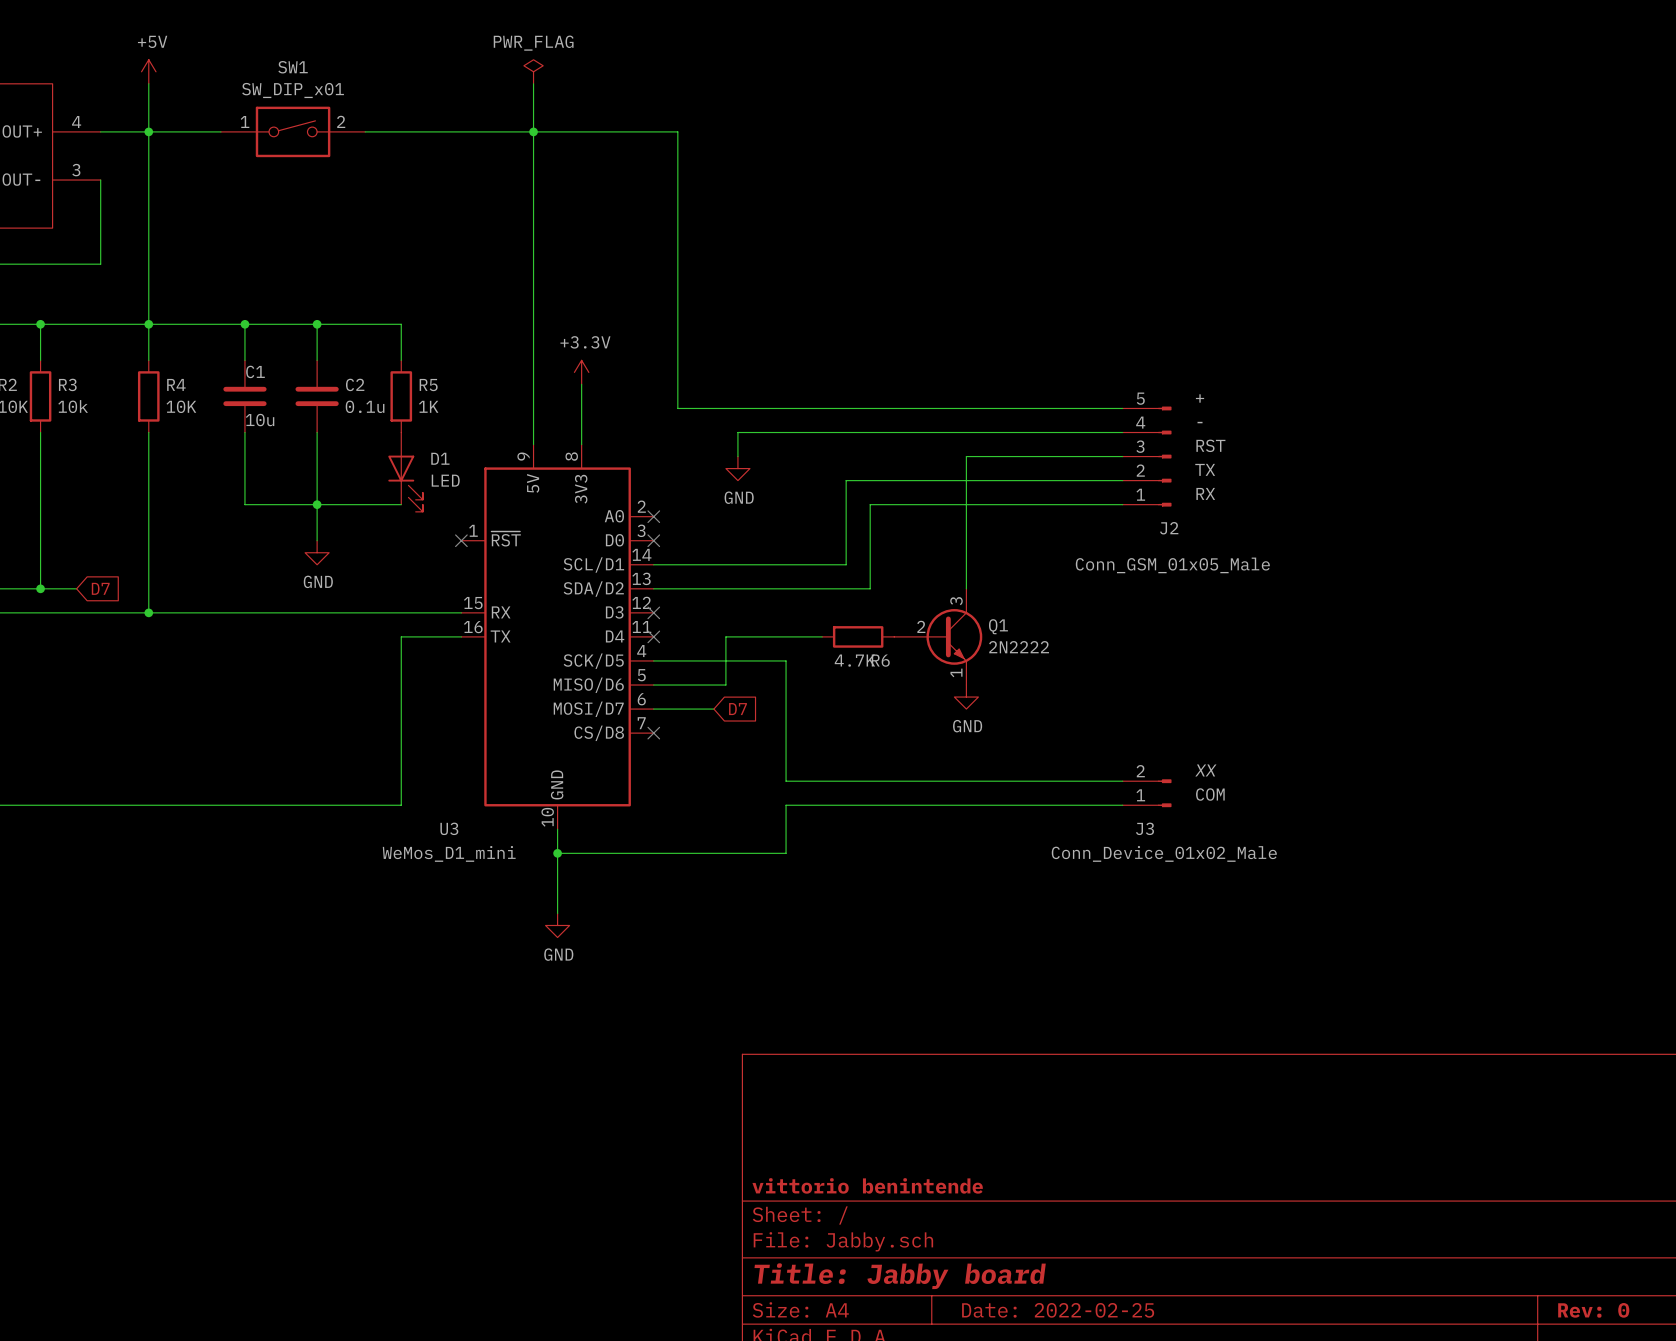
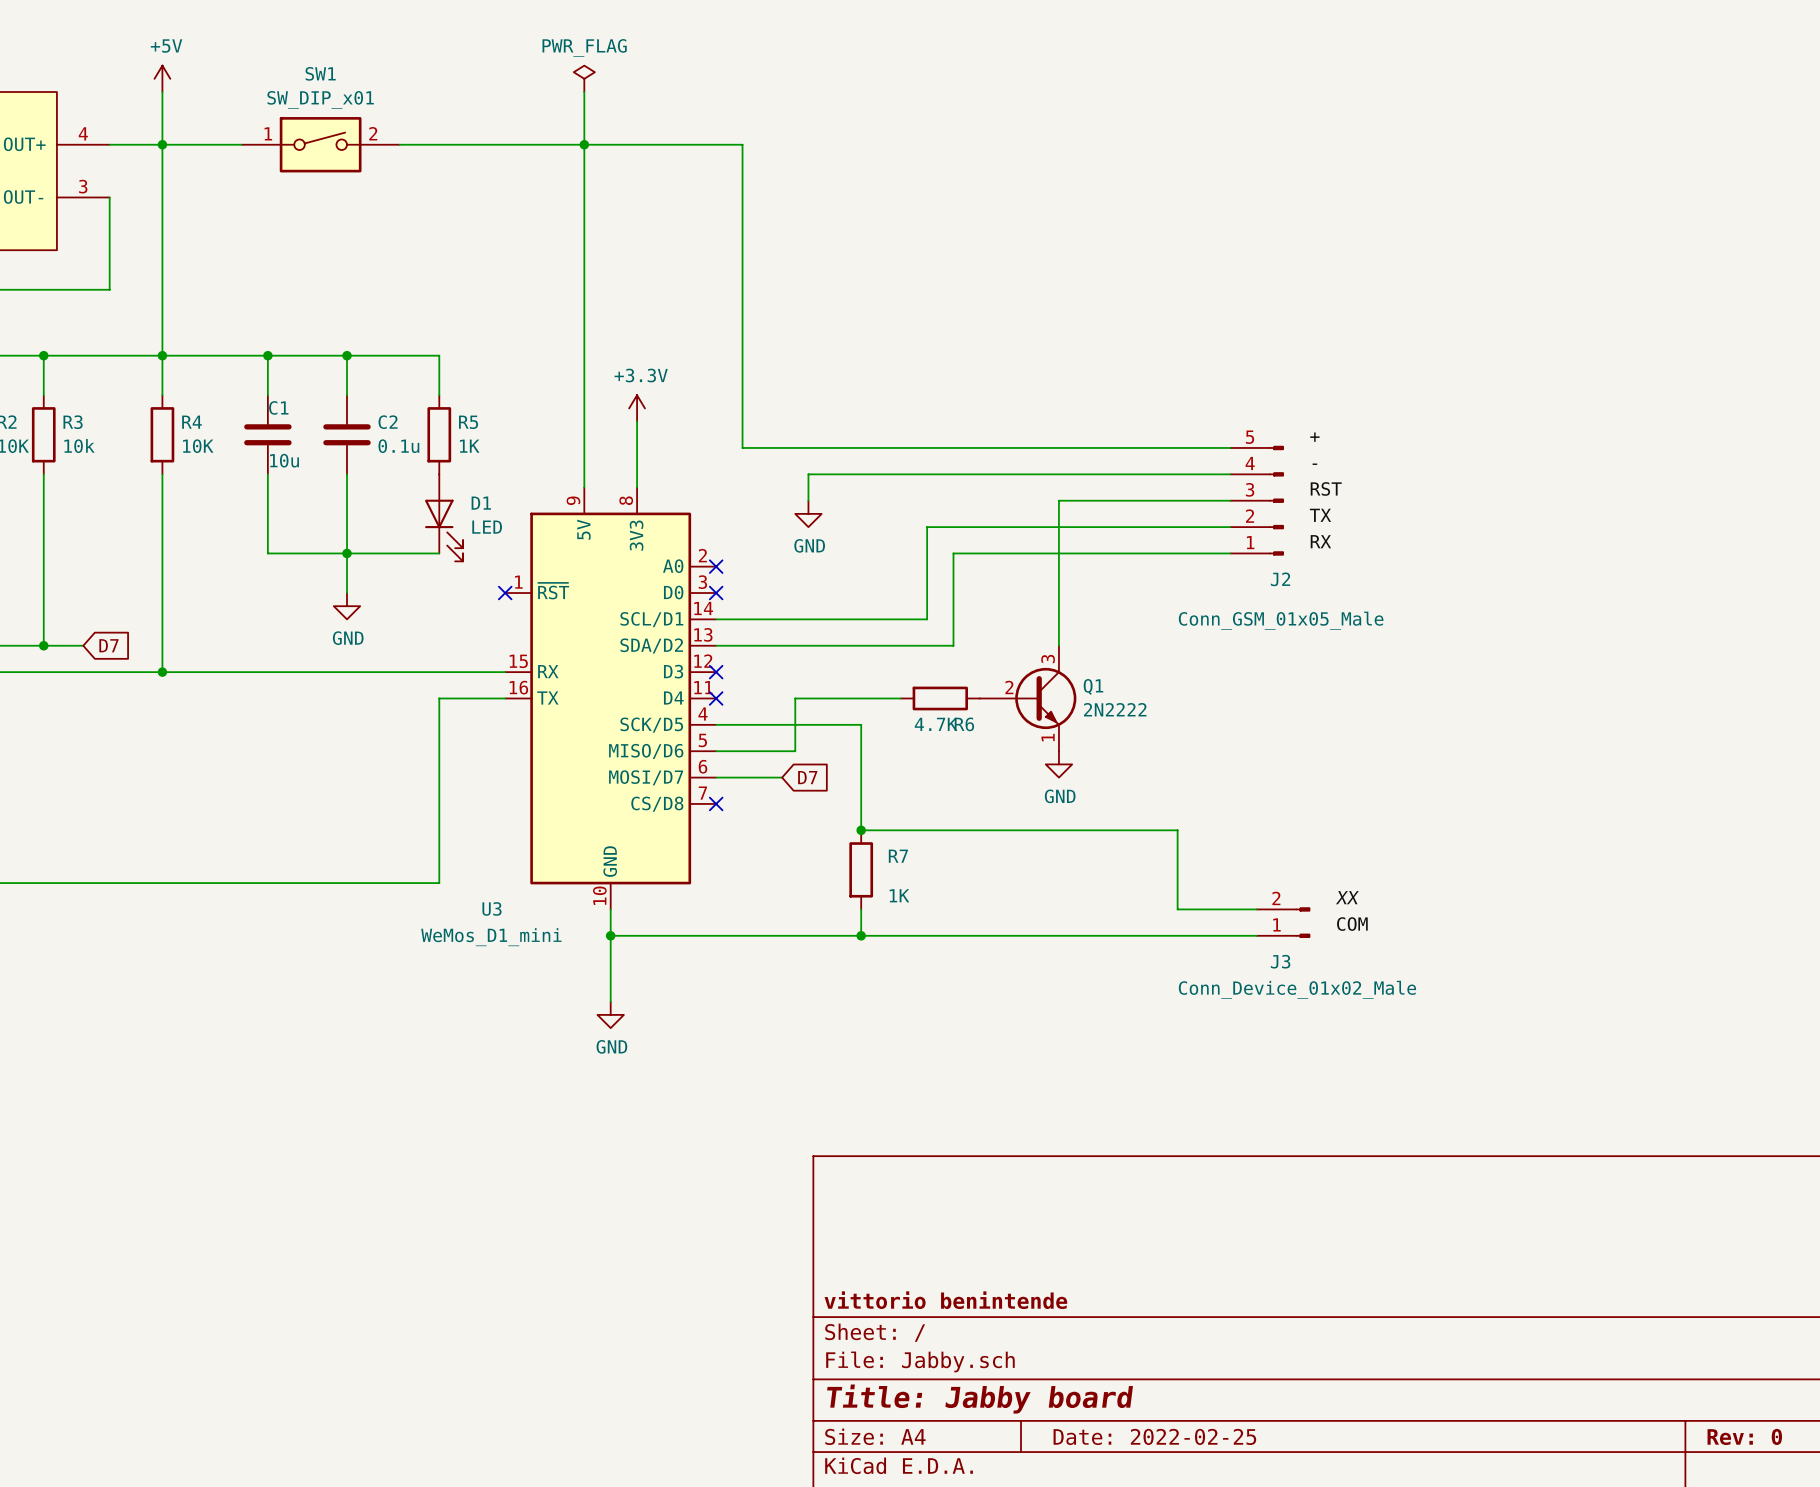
wire: (786, 757) (786, 781) (1122, 781) -> (861, 830) (1177, 830) (1177, 909) (1256, 909)
junction: none -> (861, 830)
label position: XX (1205, 770) -> XX (1347, 897)
R7: none -> 1K (861, 869)
J3 position: (1147, 793) -> (1283, 922)
label position: COM (1210, 794) -> COM (1352, 924)
wire: (1122, 805) (786, 805) (786, 829) -> none
wire: none -> (861, 935) (1256, 935)
junction: none -> (861, 935)

